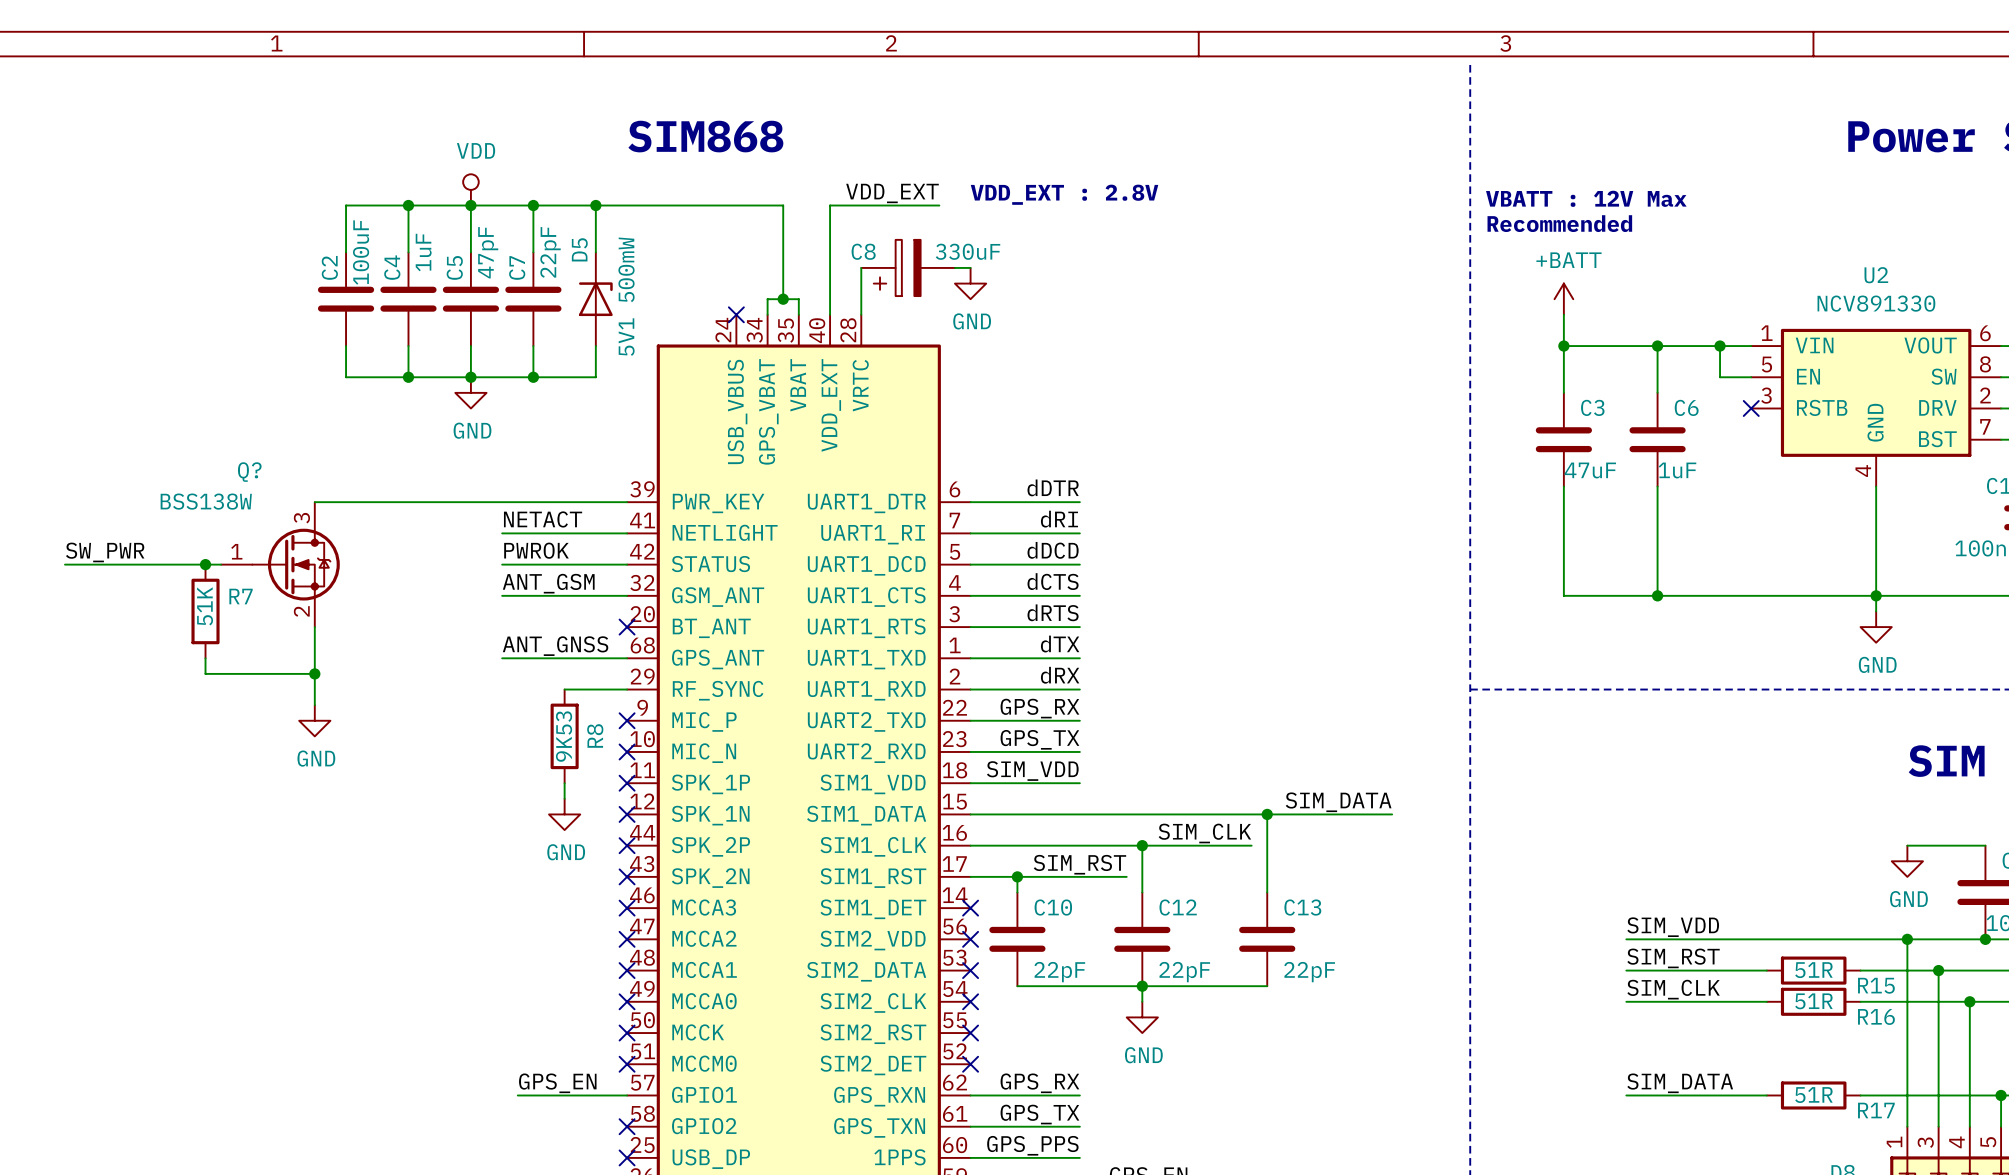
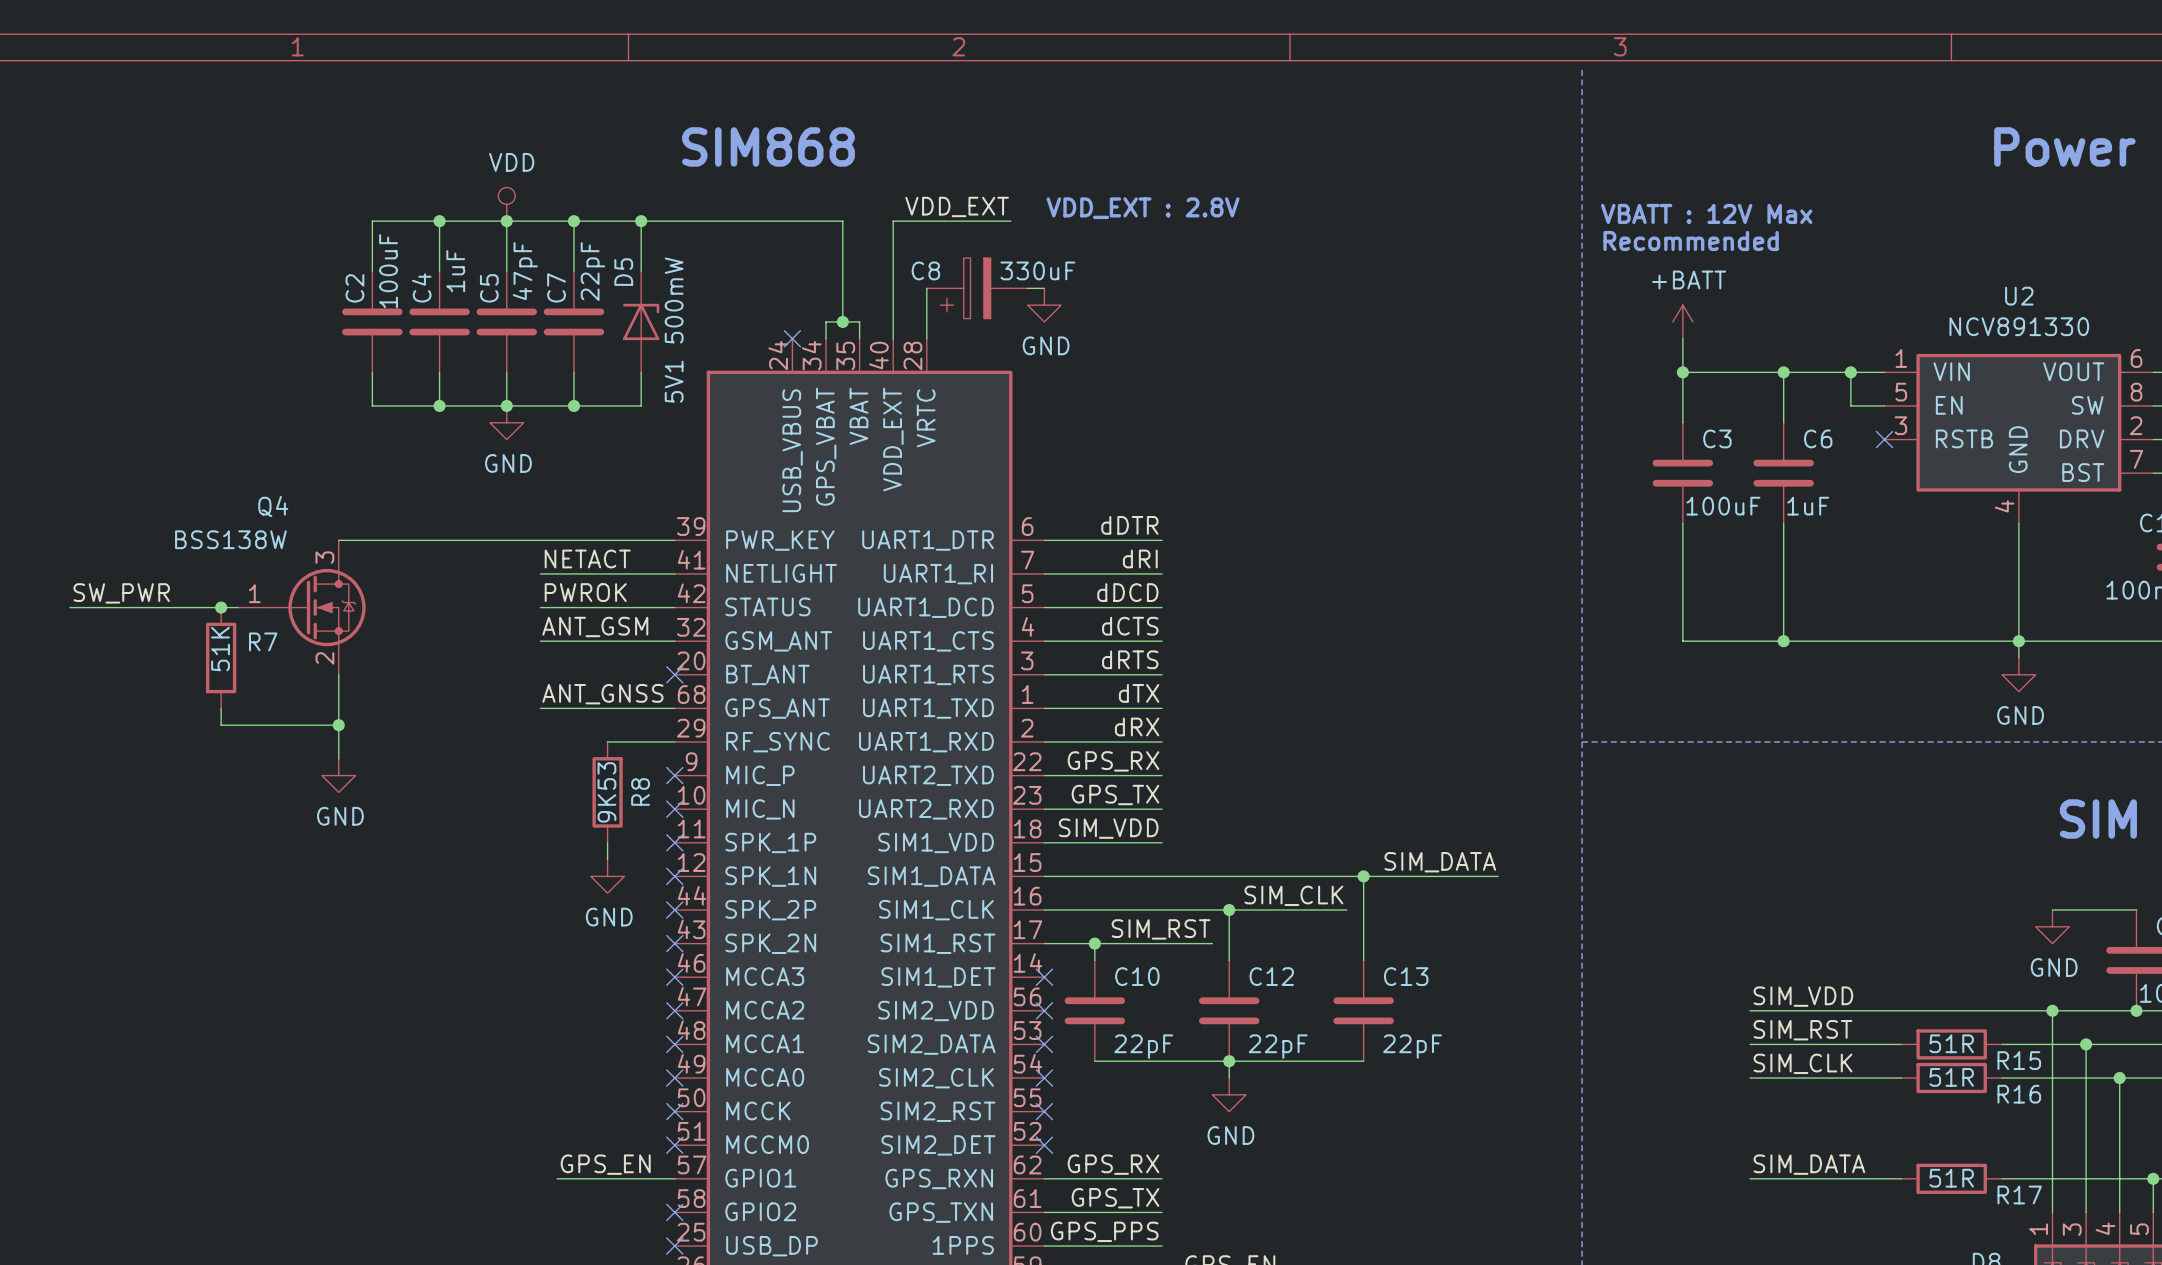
C3 value: 47uF (1590, 470) -> 100uF (1723, 506)
Q? name: Q? (249, 472) -> Q4 (273, 506)

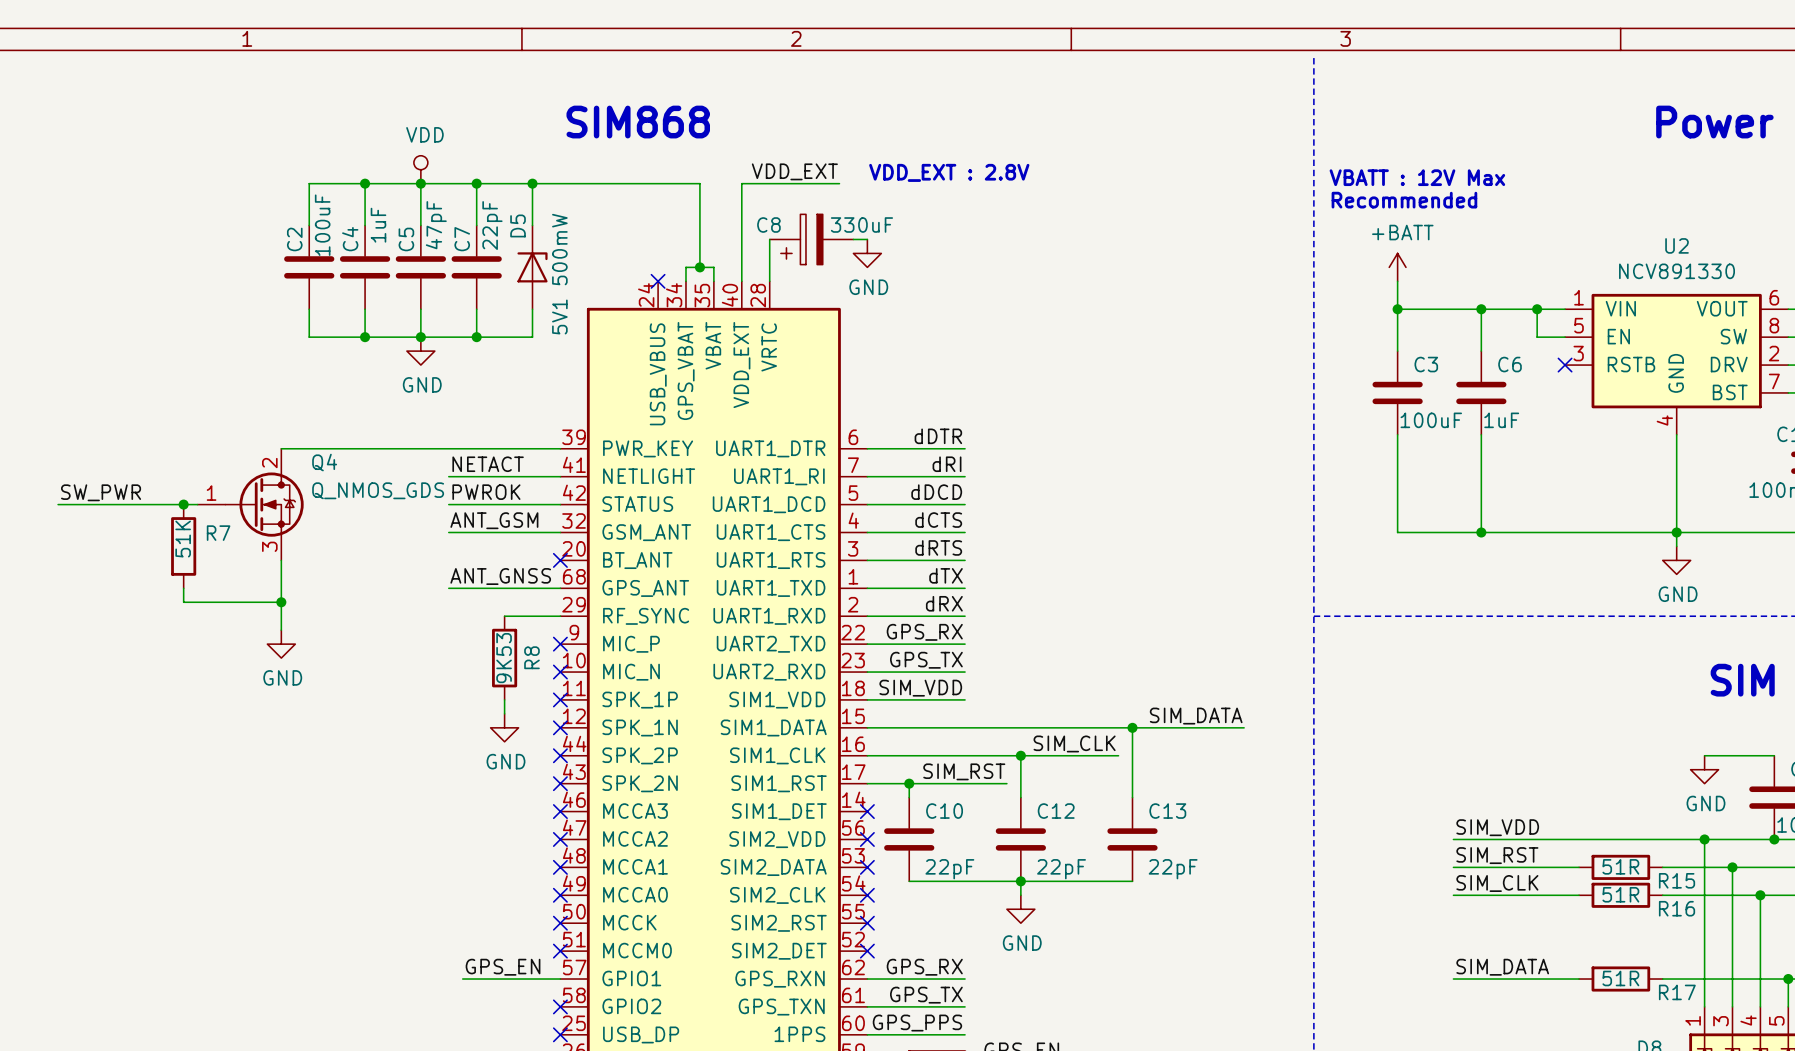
Q4 name position: Q4 (273, 506) -> Q4 (324, 462)
Q4 value: BSS138W (230, 539) -> Q_NMOS_GDS (378, 490)
Q4 pin number: 3 (324, 557) -> 2 (269, 463)
Q4 pin number: 2 (324, 658) -> 3 (269, 546)

